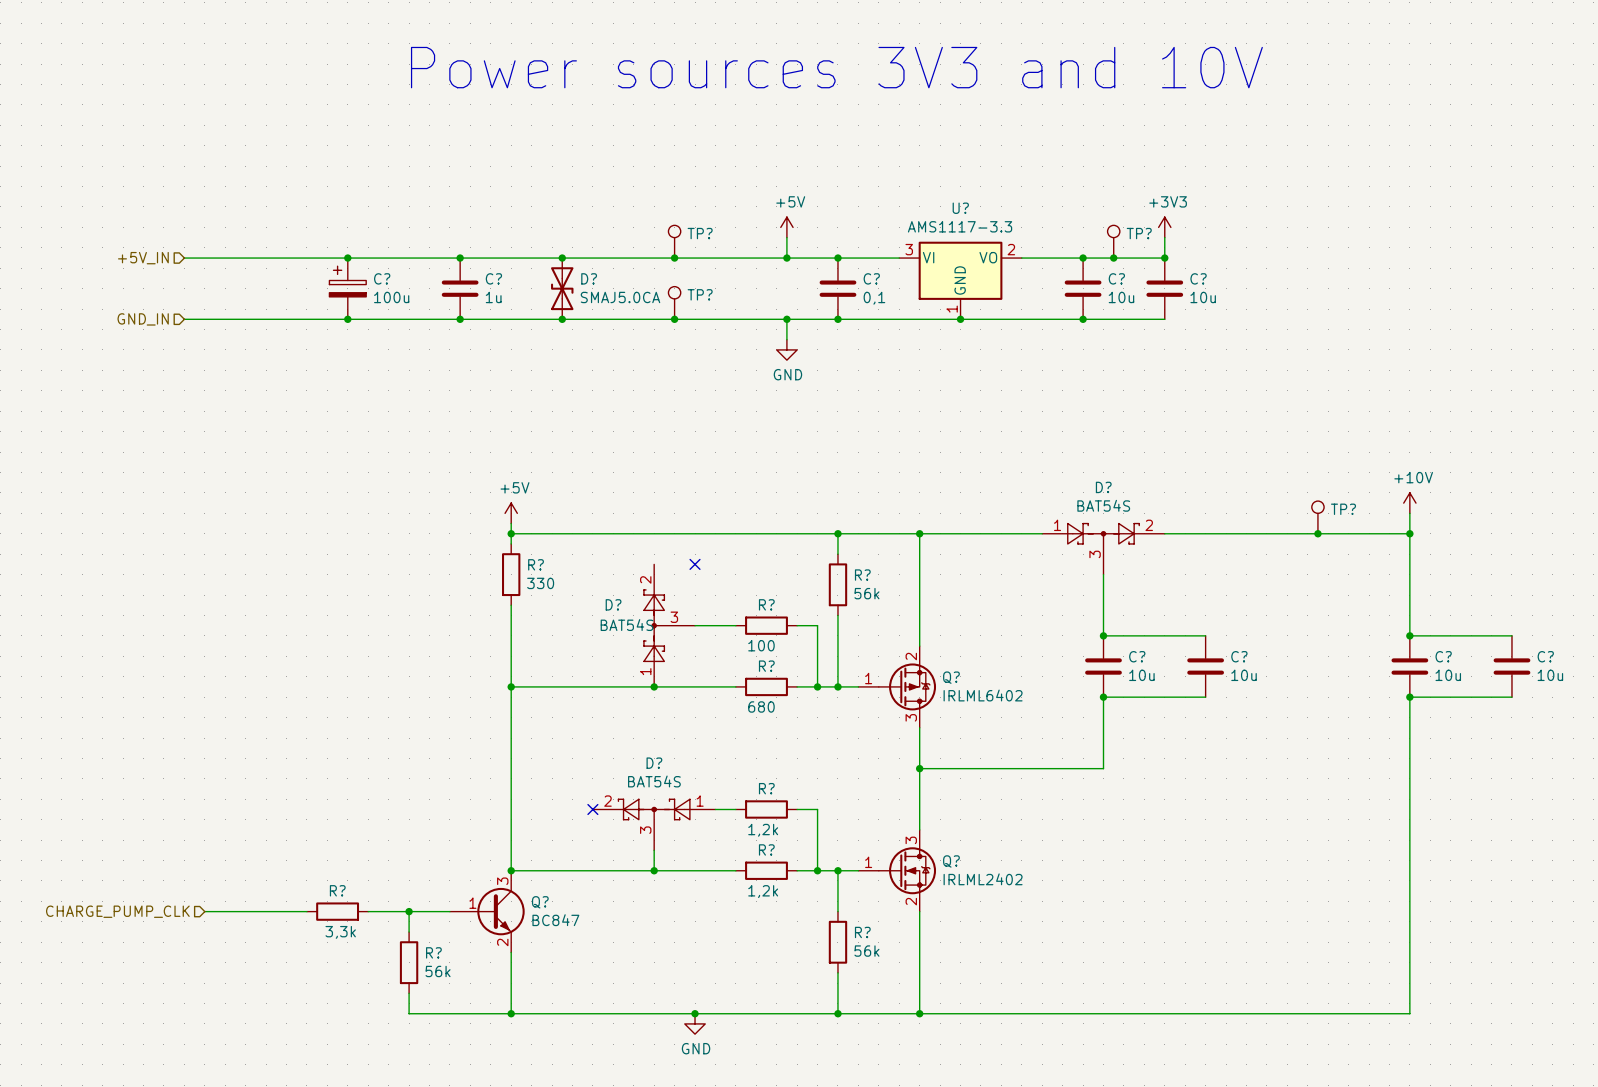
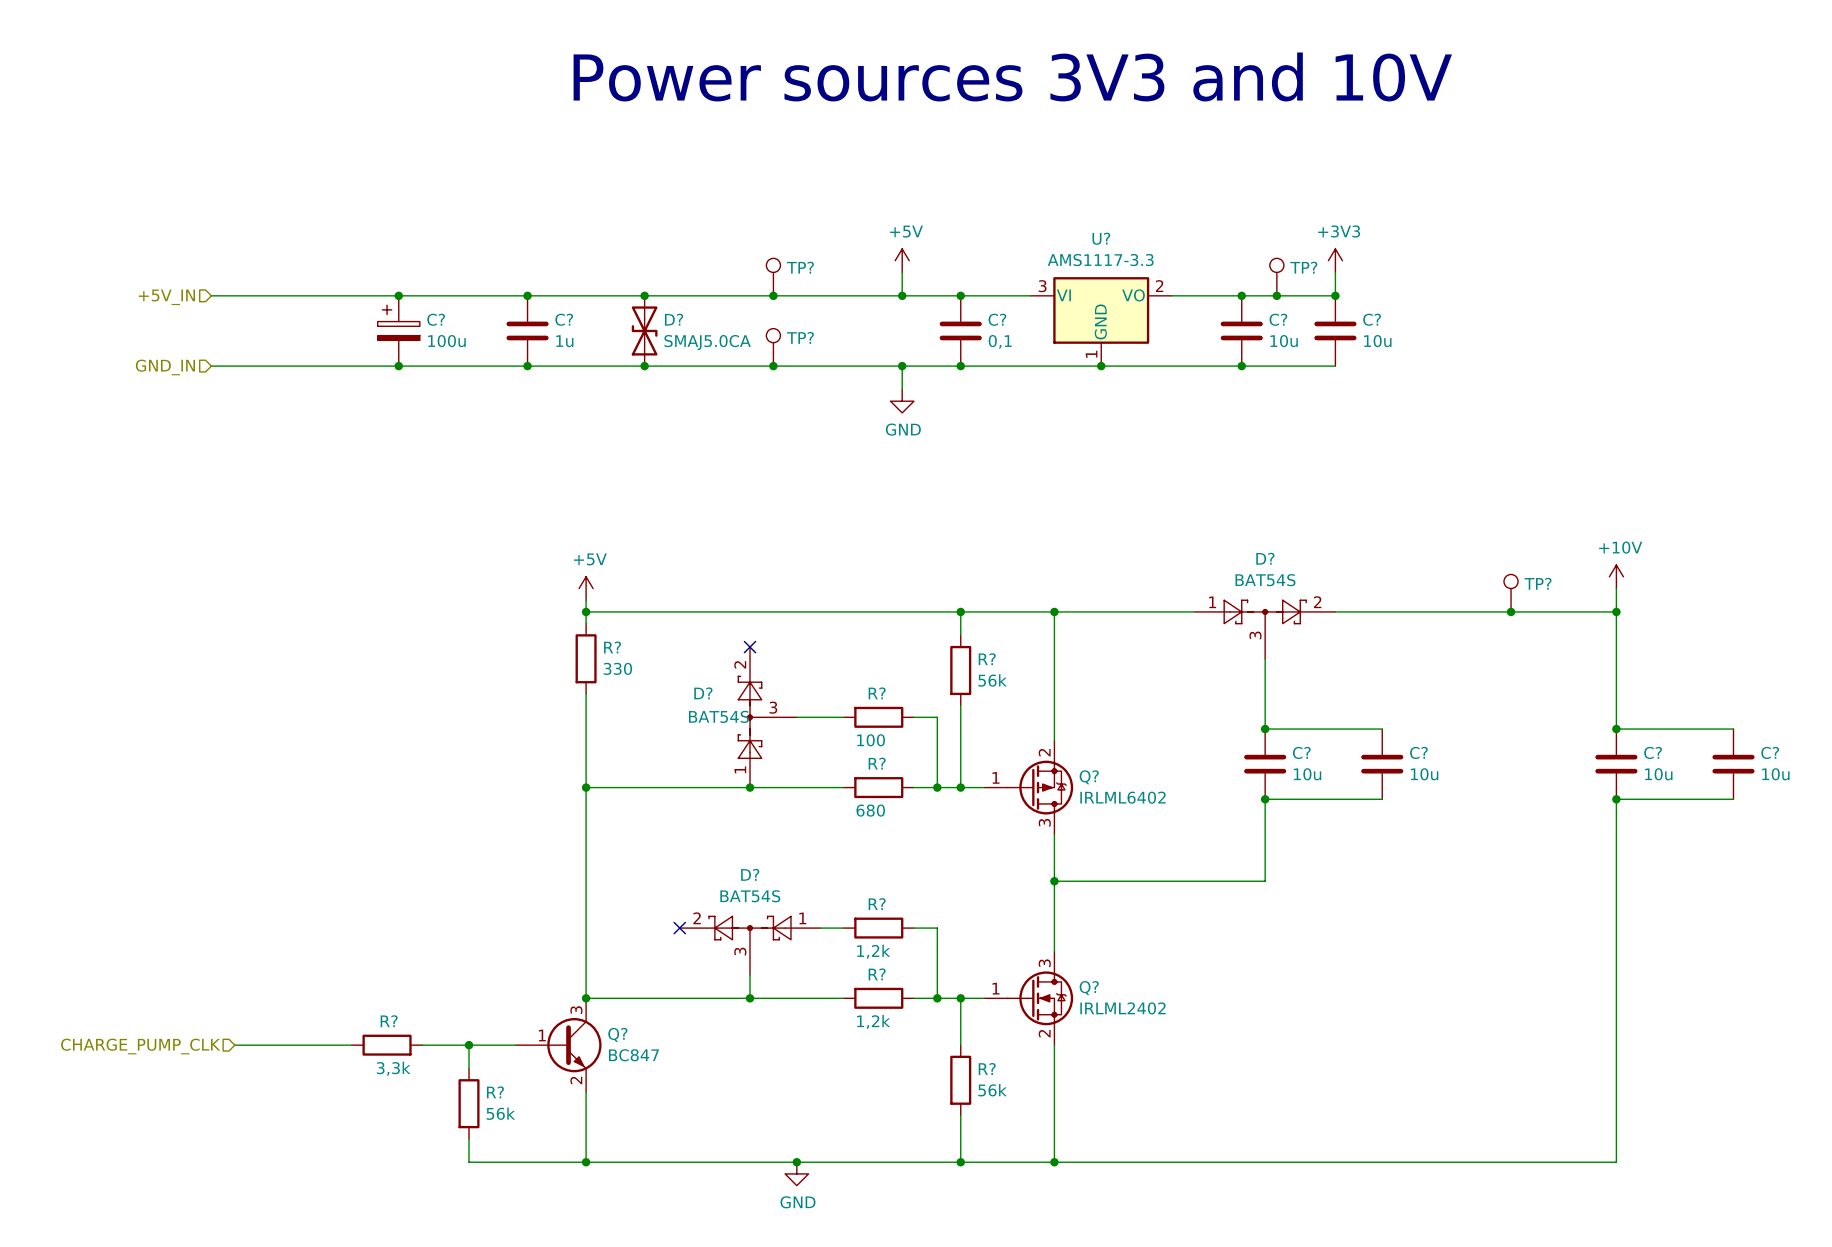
no-connect mark position: (695, 564) -> (750, 647)

